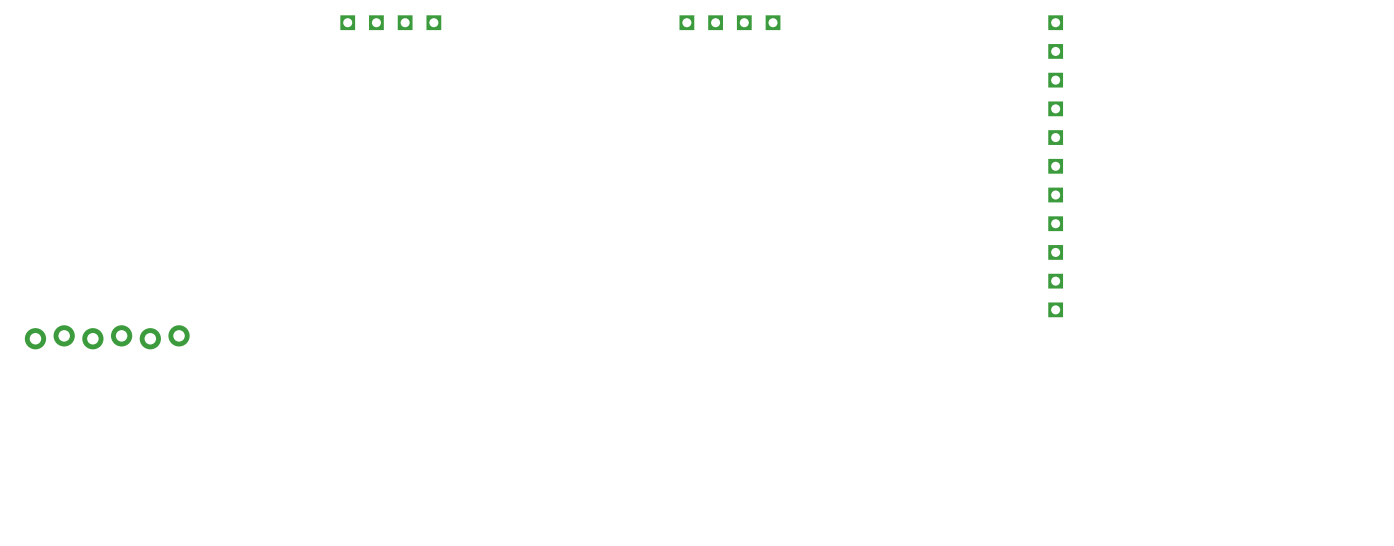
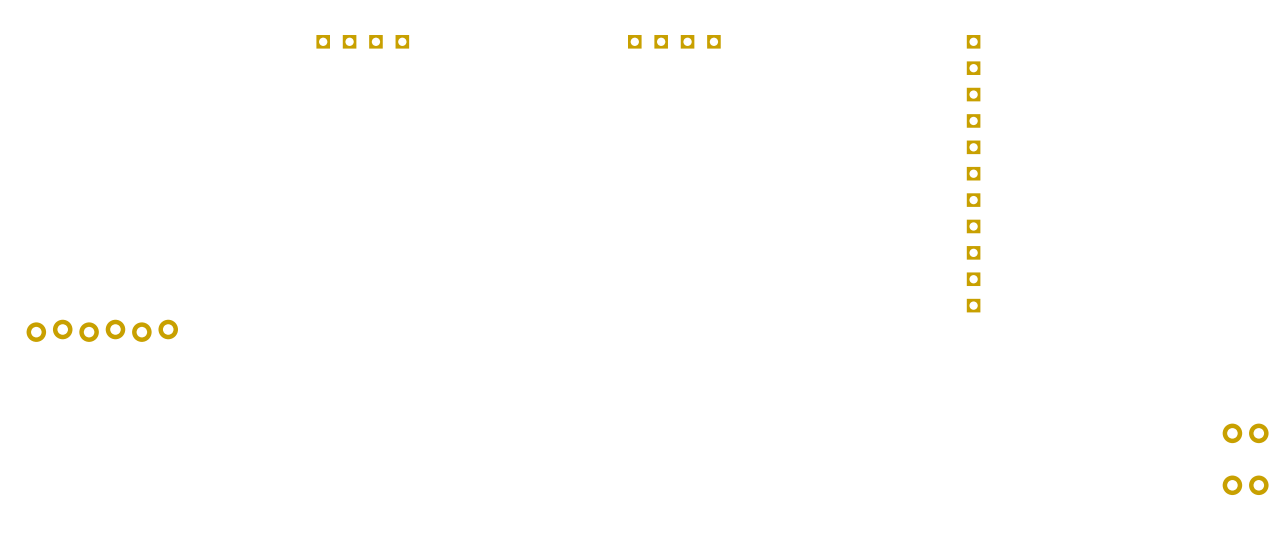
part: none -> (1245, 433)
part: none -> (1245, 485)

